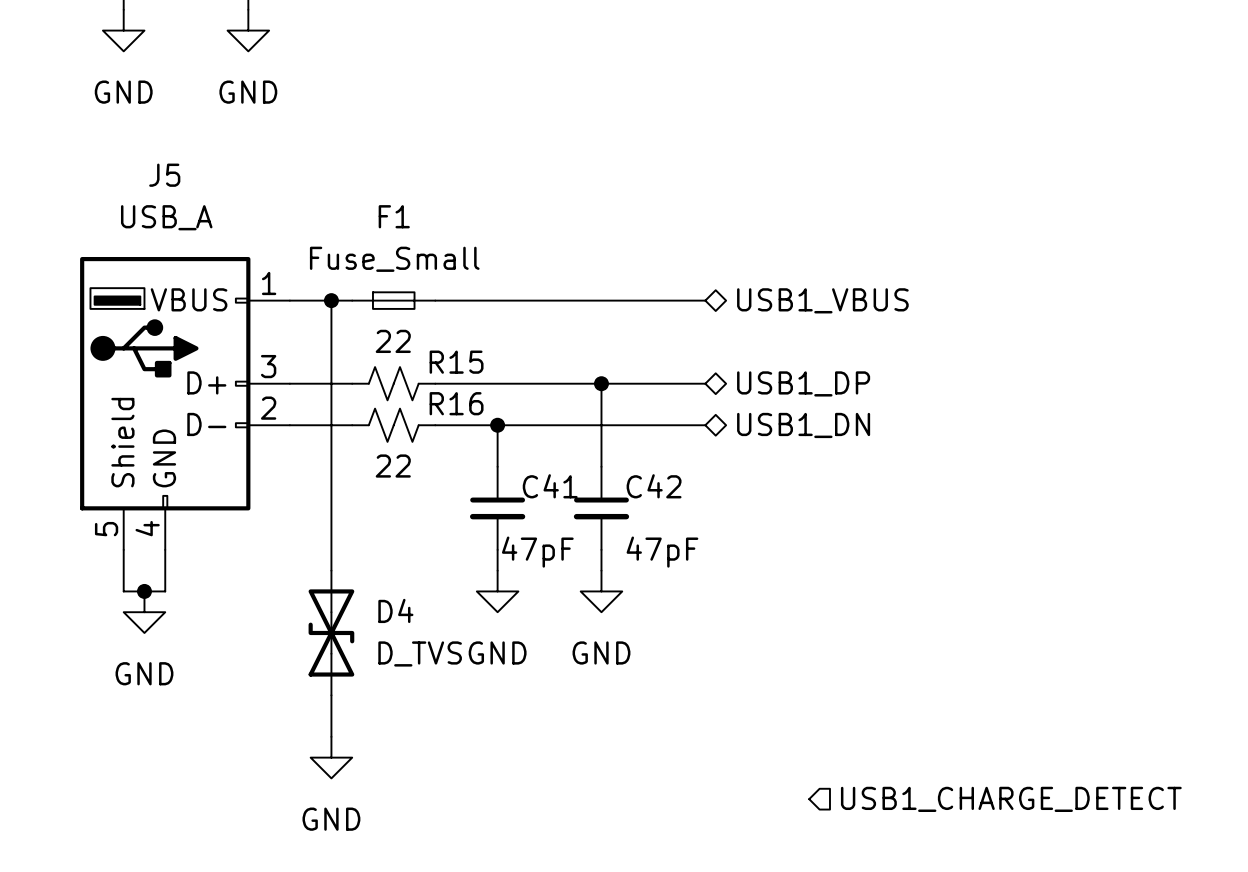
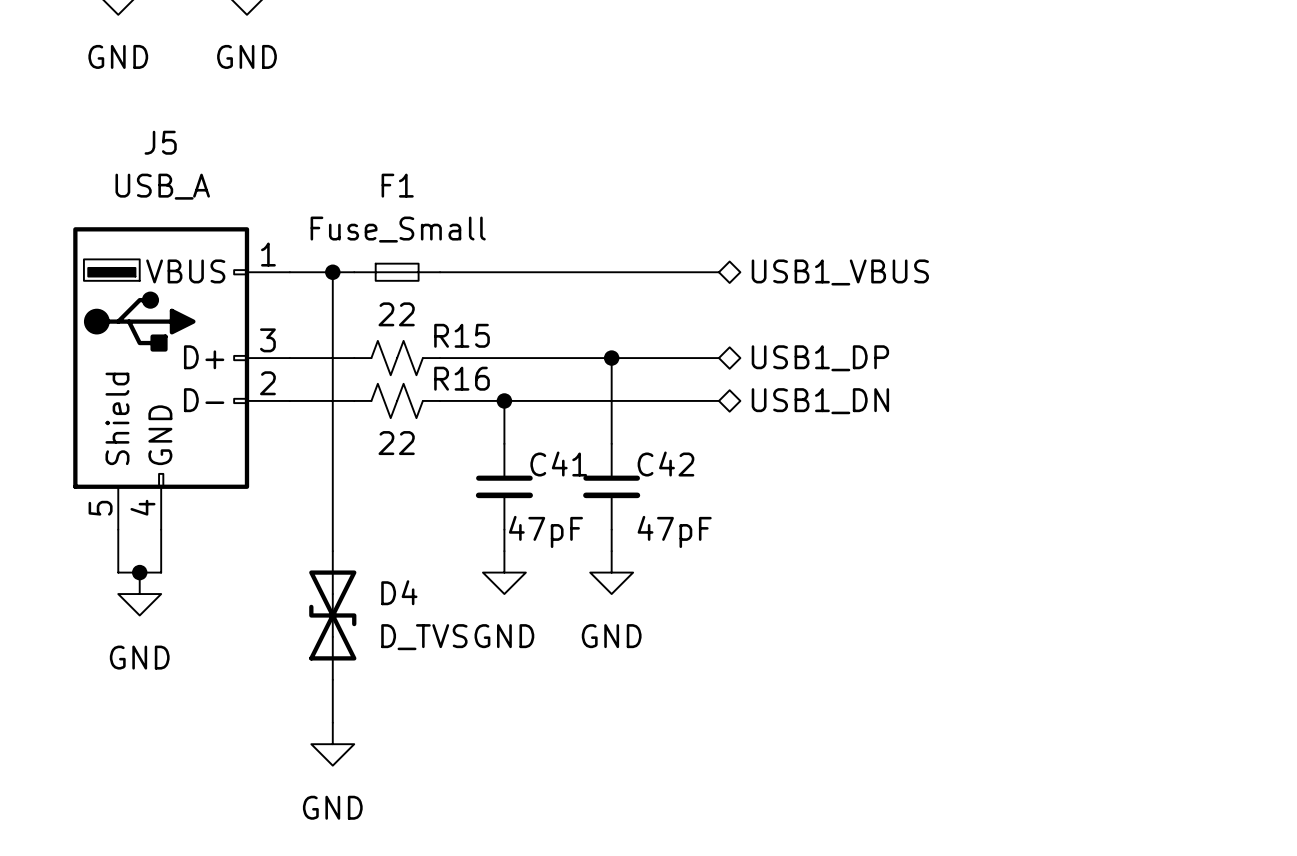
hierarchical label: USB1_CHARGE_DETECT (1011, 799) -> none

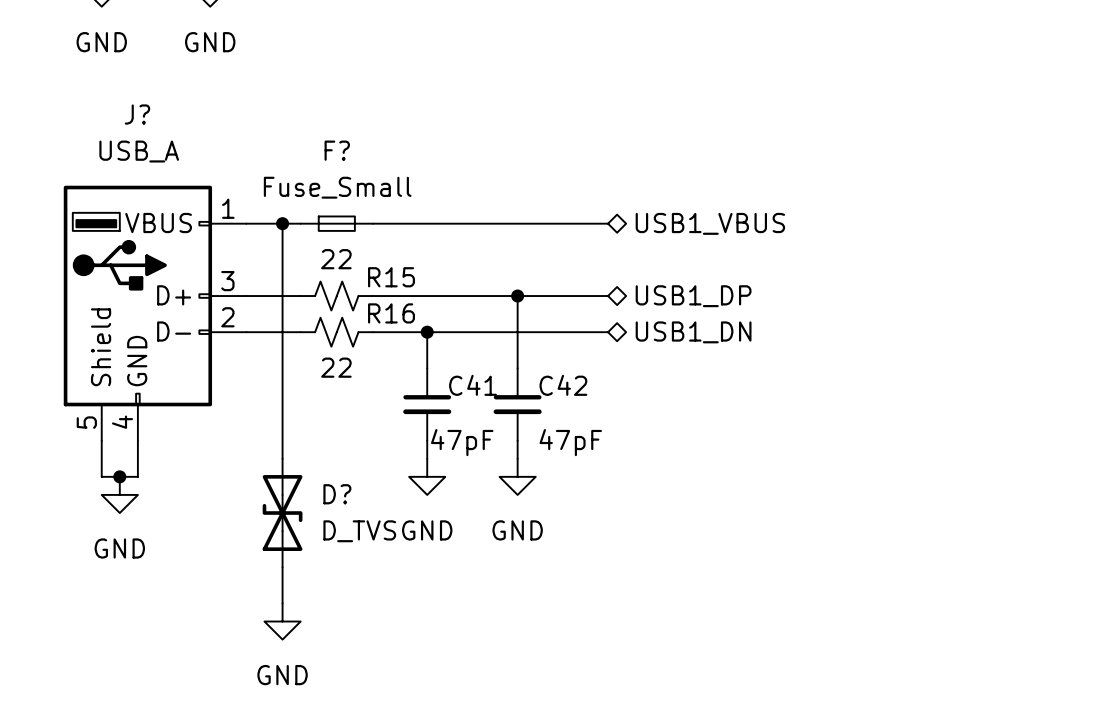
J5 name: J5 (160, 142) -> J? (137, 114)
F1 name: F1 (397, 185) -> F? (337, 150)
D4 name: D4 (399, 592) -> D? (337, 494)

